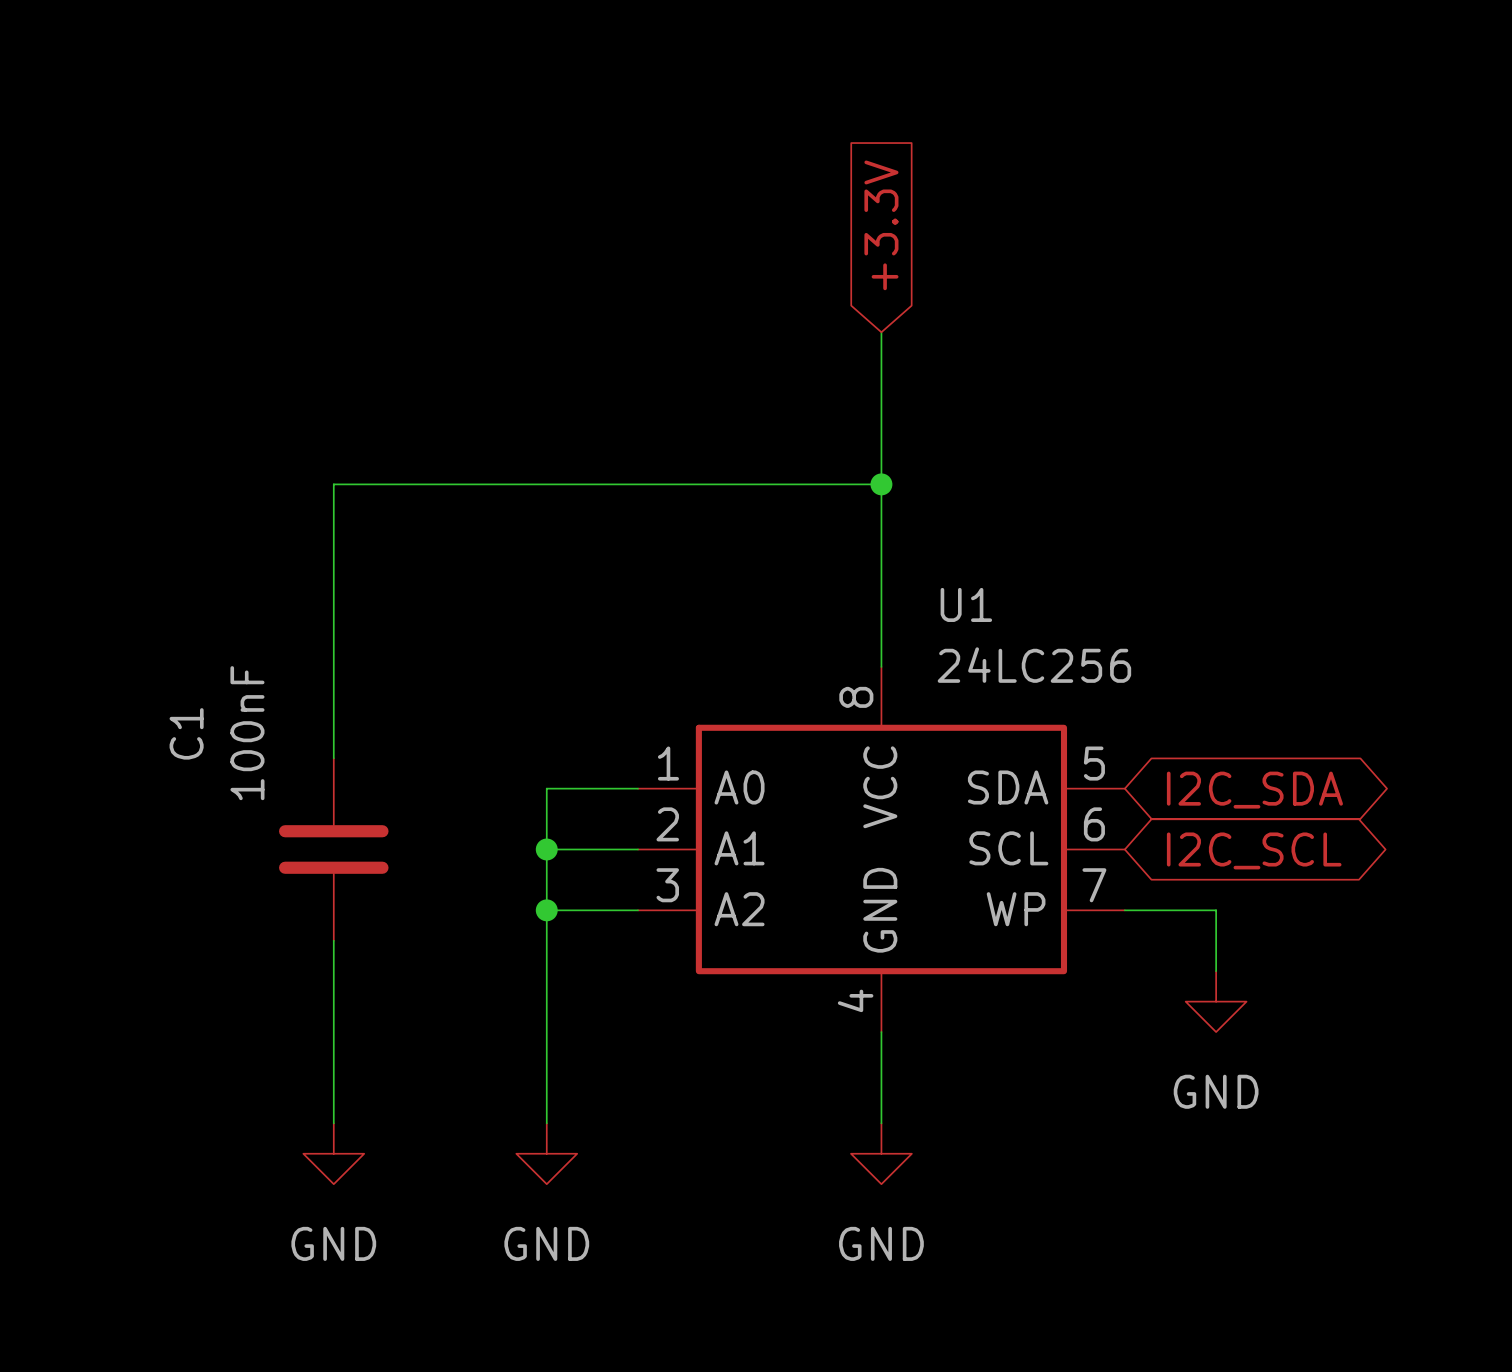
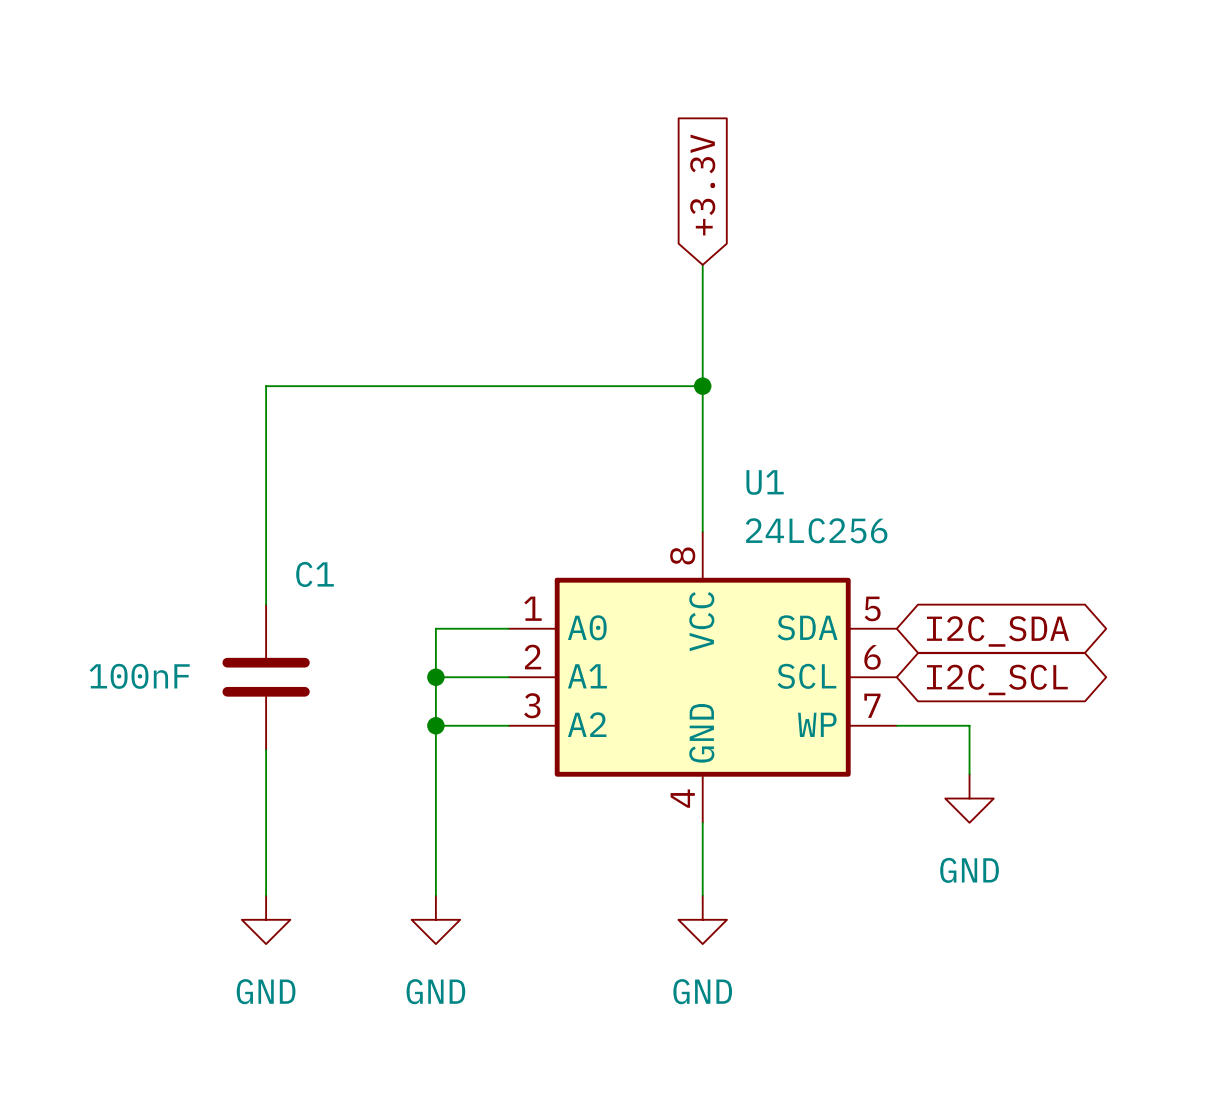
C1 name rotation: 0° (186, 733) -> 90° clockwise (315, 574)
C1 name position: C1 (186, 733) -> C1 (315, 574)
C1 value rotation: 0° (247, 733) -> 90° clockwise (139, 676)

